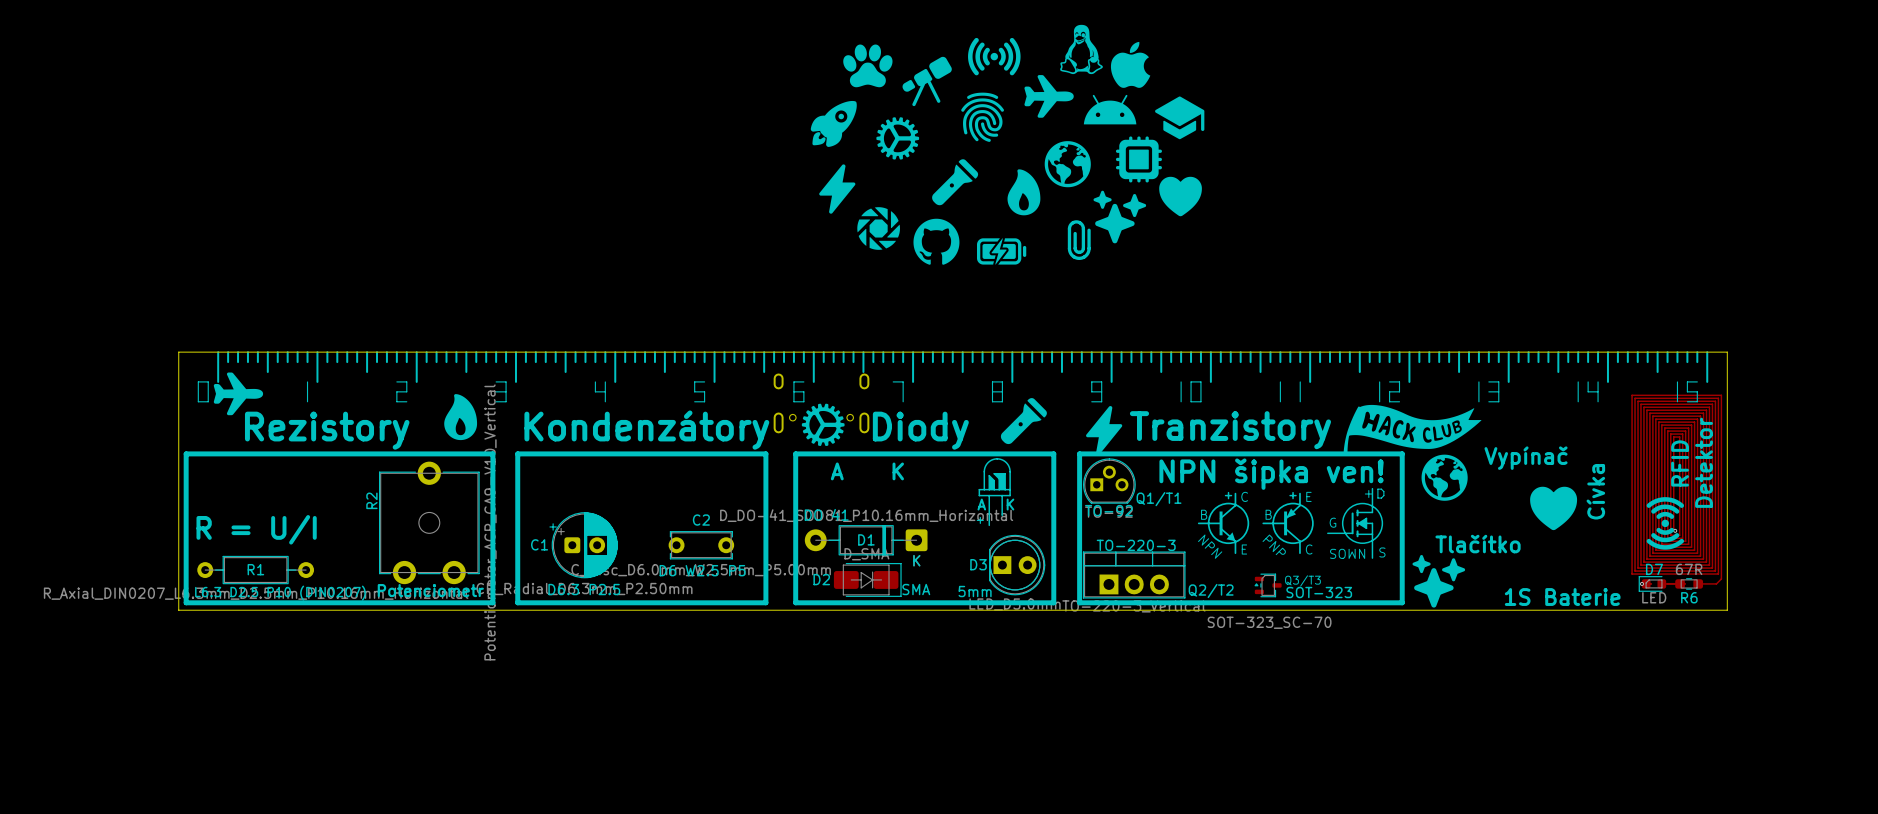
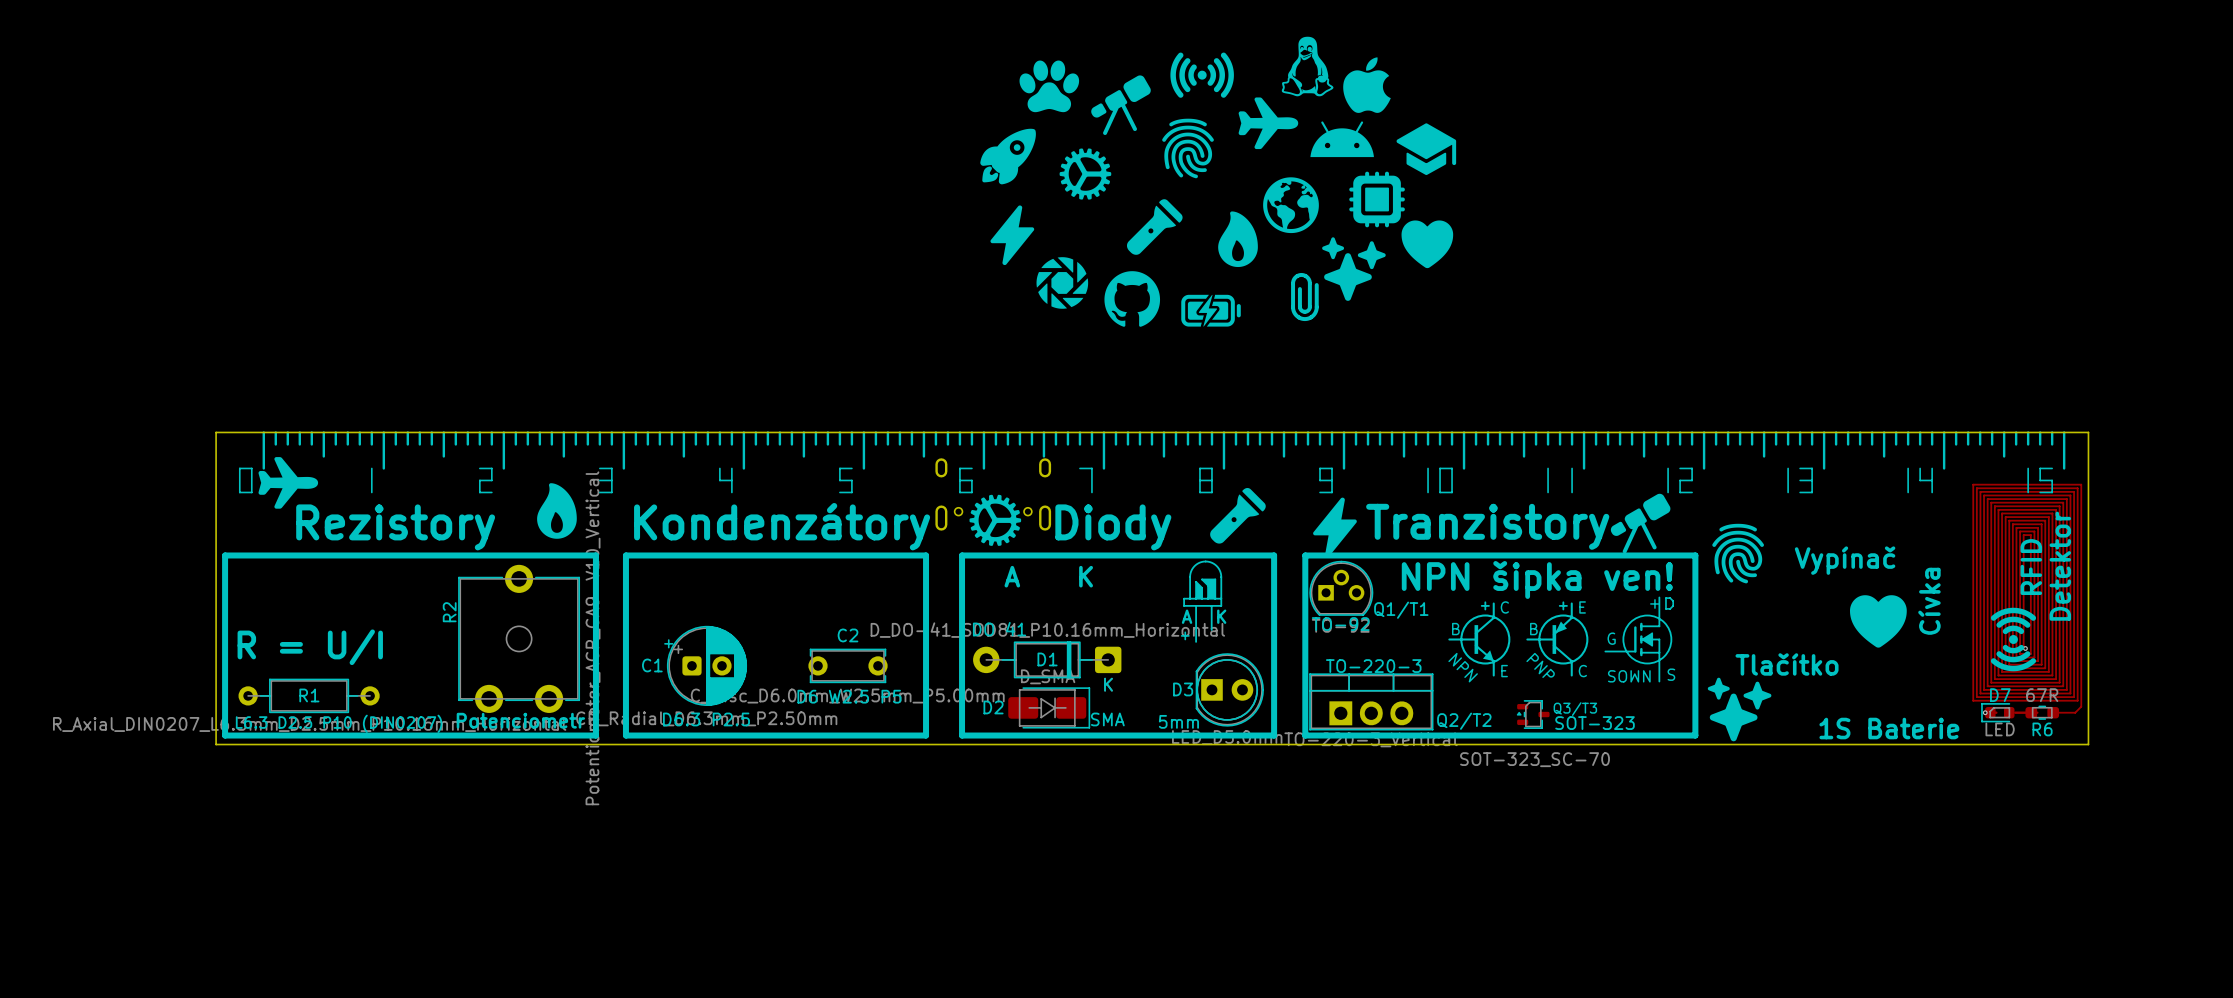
drawing: none -> [1643, 493, 1671, 521]
drawing: [1348, 404, 1482, 501] -> none
drawing shape: [1343, 406, 1360, 454] -> [1622, 508, 1657, 554]
drawing: none -> [1610, 521, 1627, 536]
drawing: none -> [1712, 523, 1764, 584]

